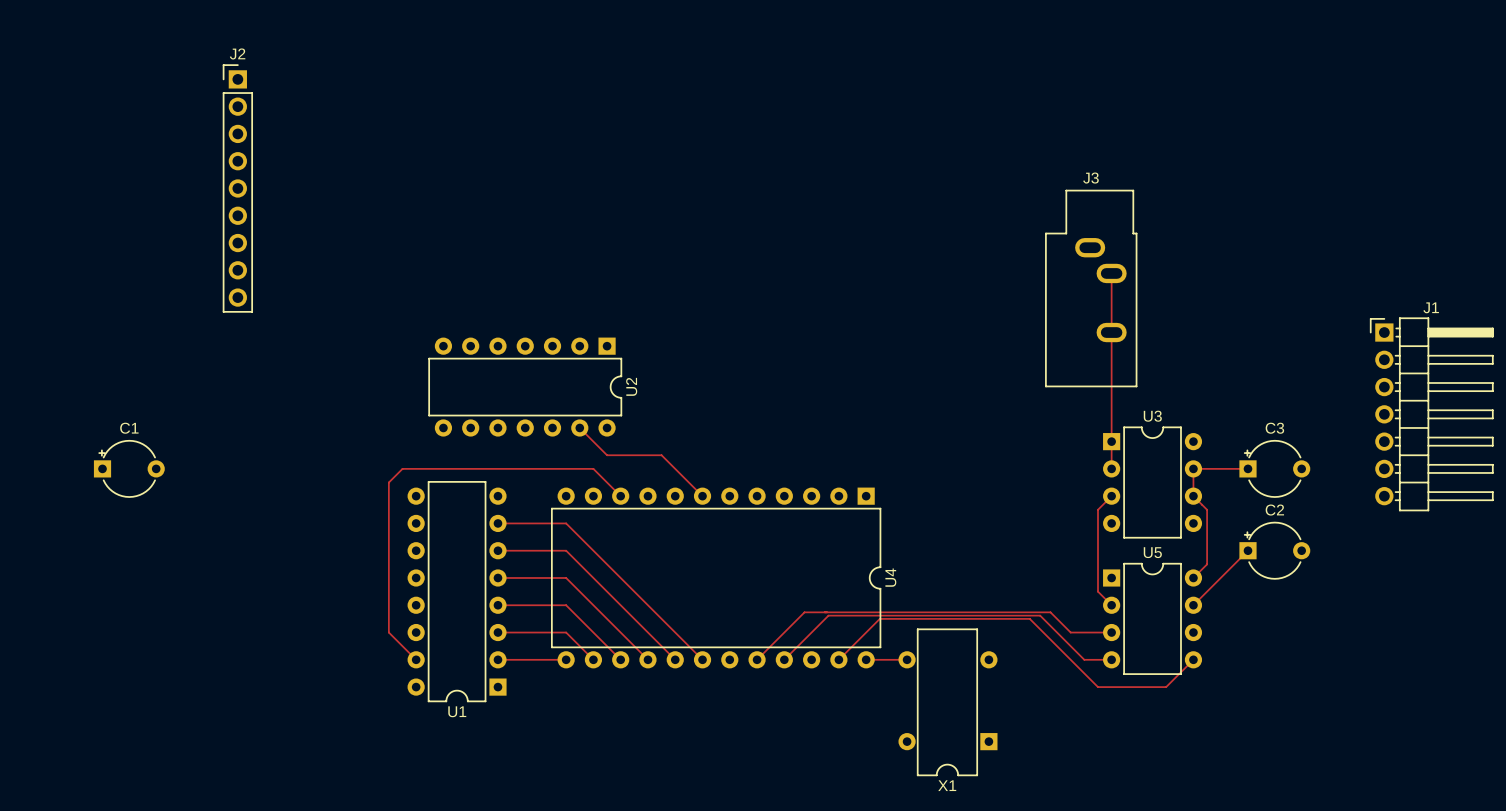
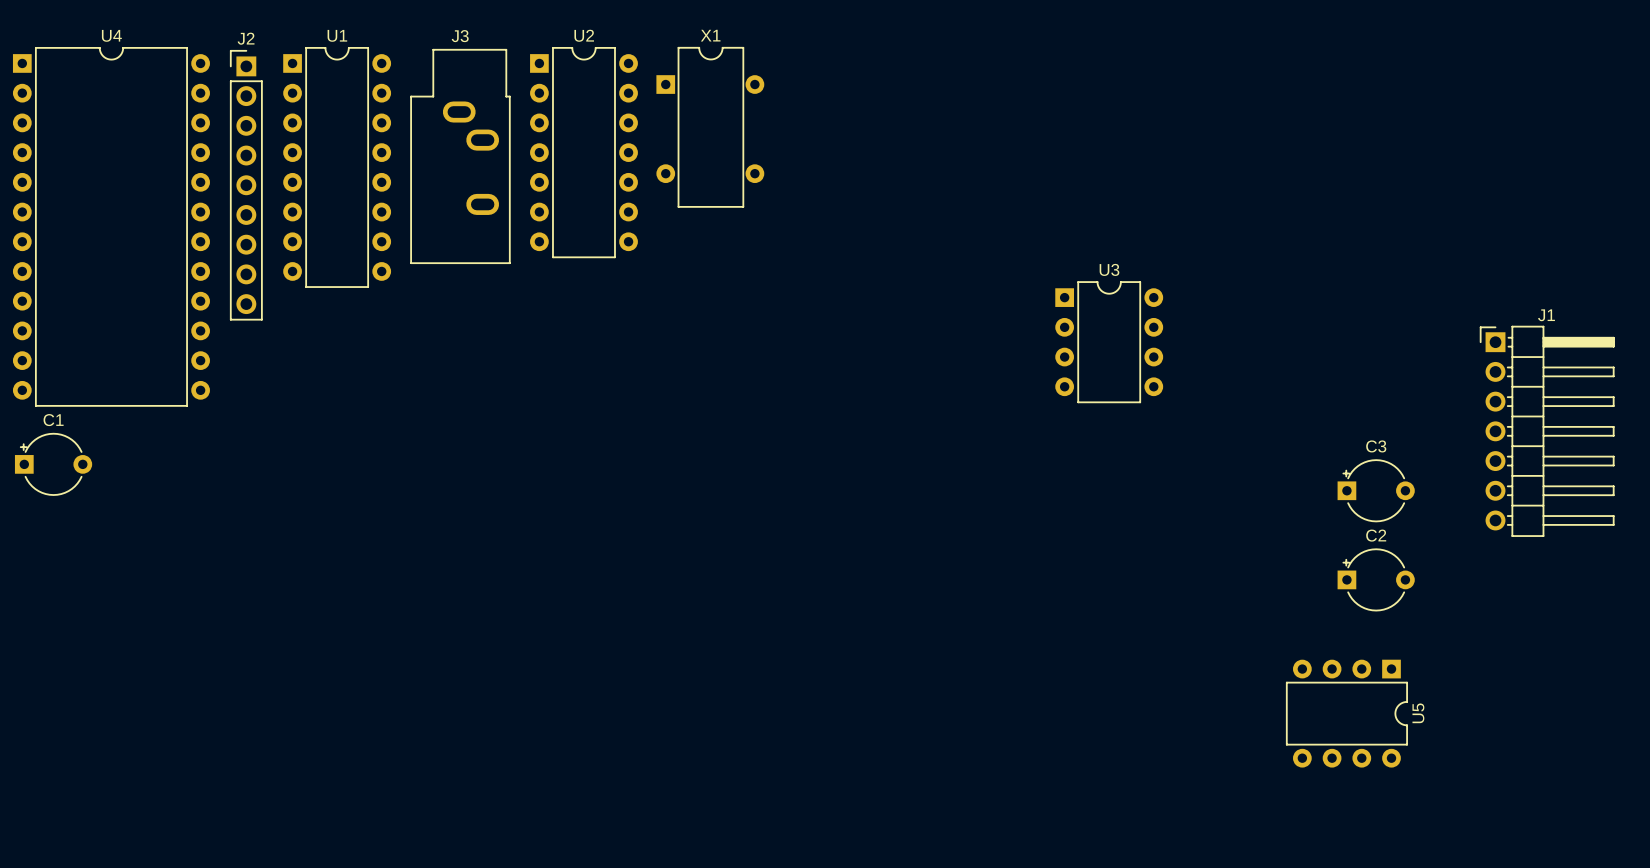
track: (1111, 273) (1111, 468) -> none
J3 position: (1091, 288) -> (460, 156)
U2 rotation: 0° (525, 387) -> 90° counterclockwise (583, 152)
U2 position: (525, 387) -> (583, 152)
track: (579, 427) (607, 455) (661, 455) (702, 496) -> none
C1 position: (129, 468) -> (53, 464)
track: (1247, 468) (1193, 468) (1193, 496) (1207, 509) (1207, 564) (1193, 577) -> none
U3 position: (1152, 482) -> (1109, 342)
track: (620, 496) (593, 468) (402, 468) (388, 482) (388, 632) (416, 659) -> none
track: (1111, 496) (1097, 509) (1097, 591) (1111, 605) -> none
track: (497, 523) (566, 523) (702, 659) -> none
track: (497, 550) (566, 550) (675, 659) -> none
track: (1247, 550) (1193, 605) -> none
track: (497, 577) (566, 577) (647, 659) -> none
U4 rotation: 0° (716, 577) -> 90° counterclockwise (111, 226)
U4 position: (716, 577) -> (111, 226)
U1 rotation: 0° (457, 591) -> 180° (337, 167)
U1 position: (457, 591) -> (337, 167)
track: (497, 605) (566, 605) (620, 659) -> none
U5 rotation: 0° (1152, 618) -> 90° clockwise (1346, 713)
U5 position: (1152, 618) -> (1346, 713)
track: (497, 632) (566, 632) (593, 659) -> none
track: (1111, 632) (1070, 632) (1050, 612) (804, 612) (757, 659) -> none
track: (497, 659) (566, 659) -> none
track: (784, 659) (828, 615) (1040, 615) (1084, 659) (1111, 659) -> none
track: (838, 659) (879, 618) (1029, 618) (1097, 687) (1166, 687) (1193, 659) -> none
track: (866, 659) (907, 659) -> none
X1 rotation: 0° (947, 702) -> 180° (710, 127)
X1 position: (947, 702) -> (710, 127)

